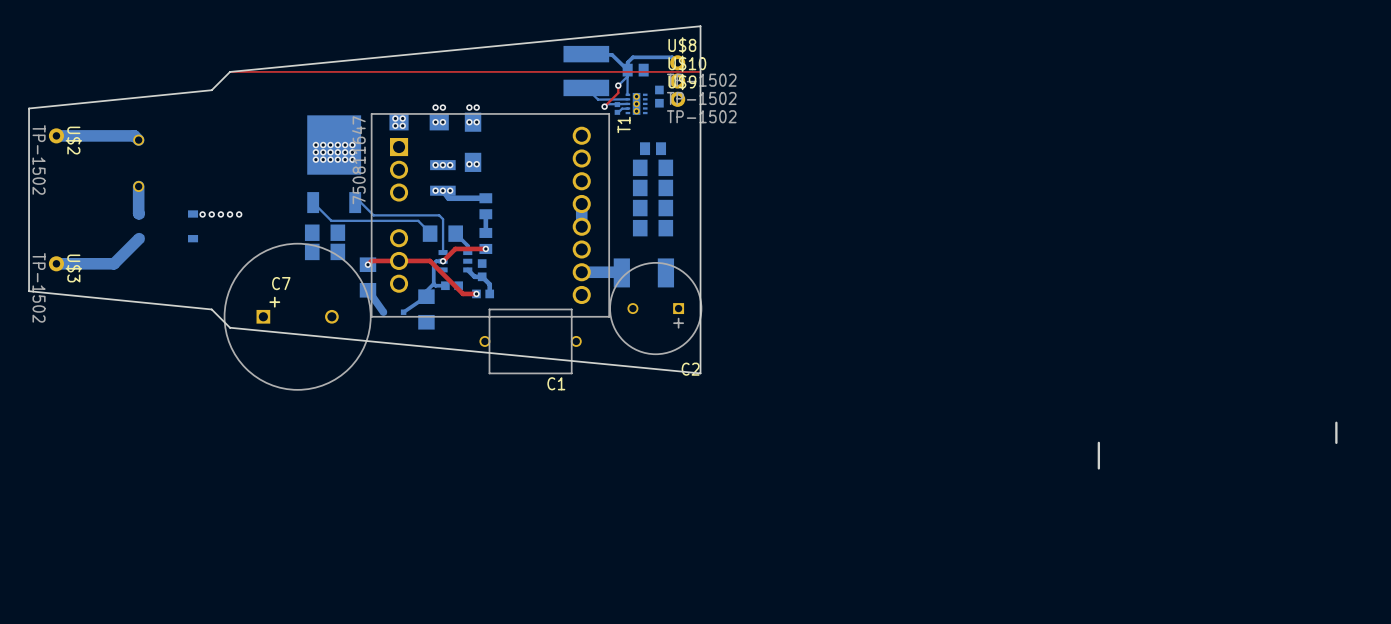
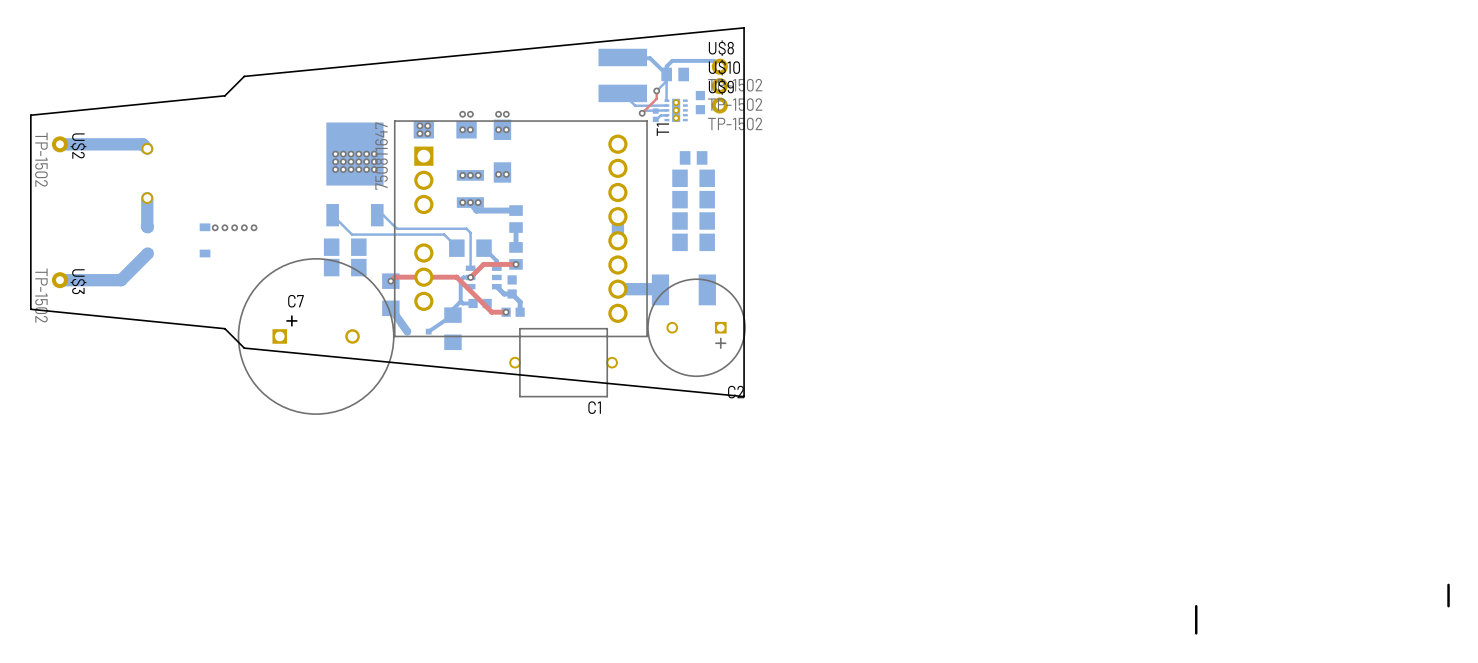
top track: (230, 71) (700, 71) -> none
board edge: (1336, 422) (1336, 442) -> (1448, 584) (1448, 606)
board edge: (1098, 442) (1098, 468) -> (1196, 606) (1196, 633)

